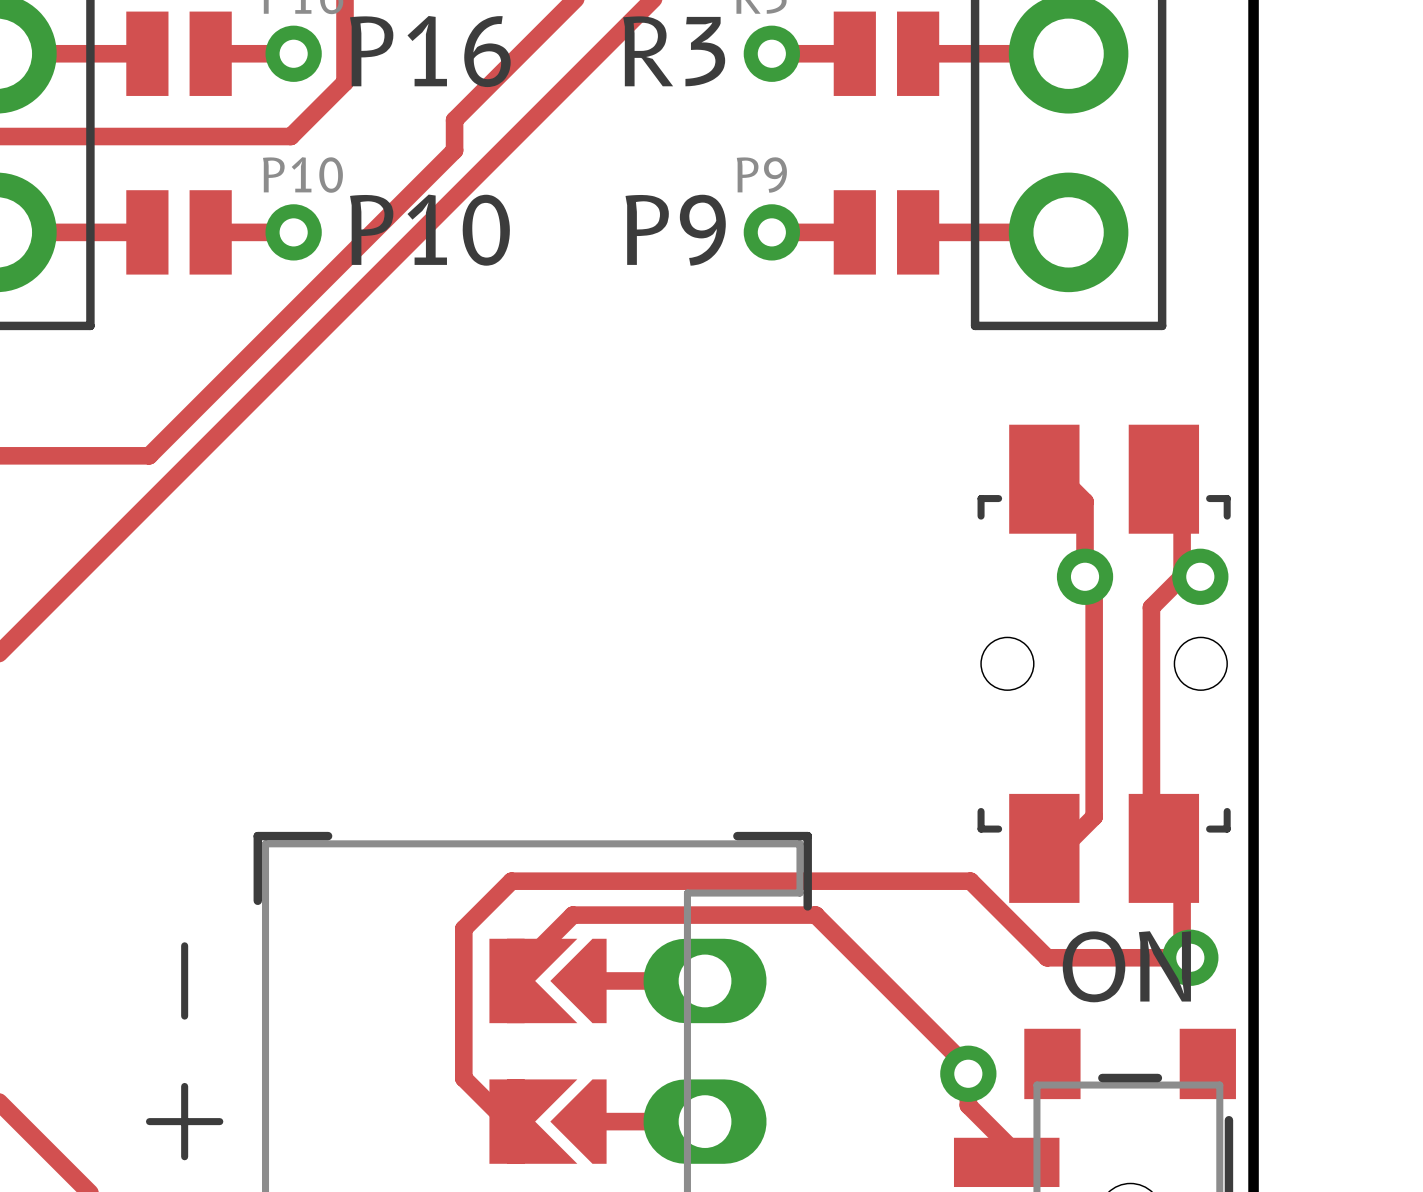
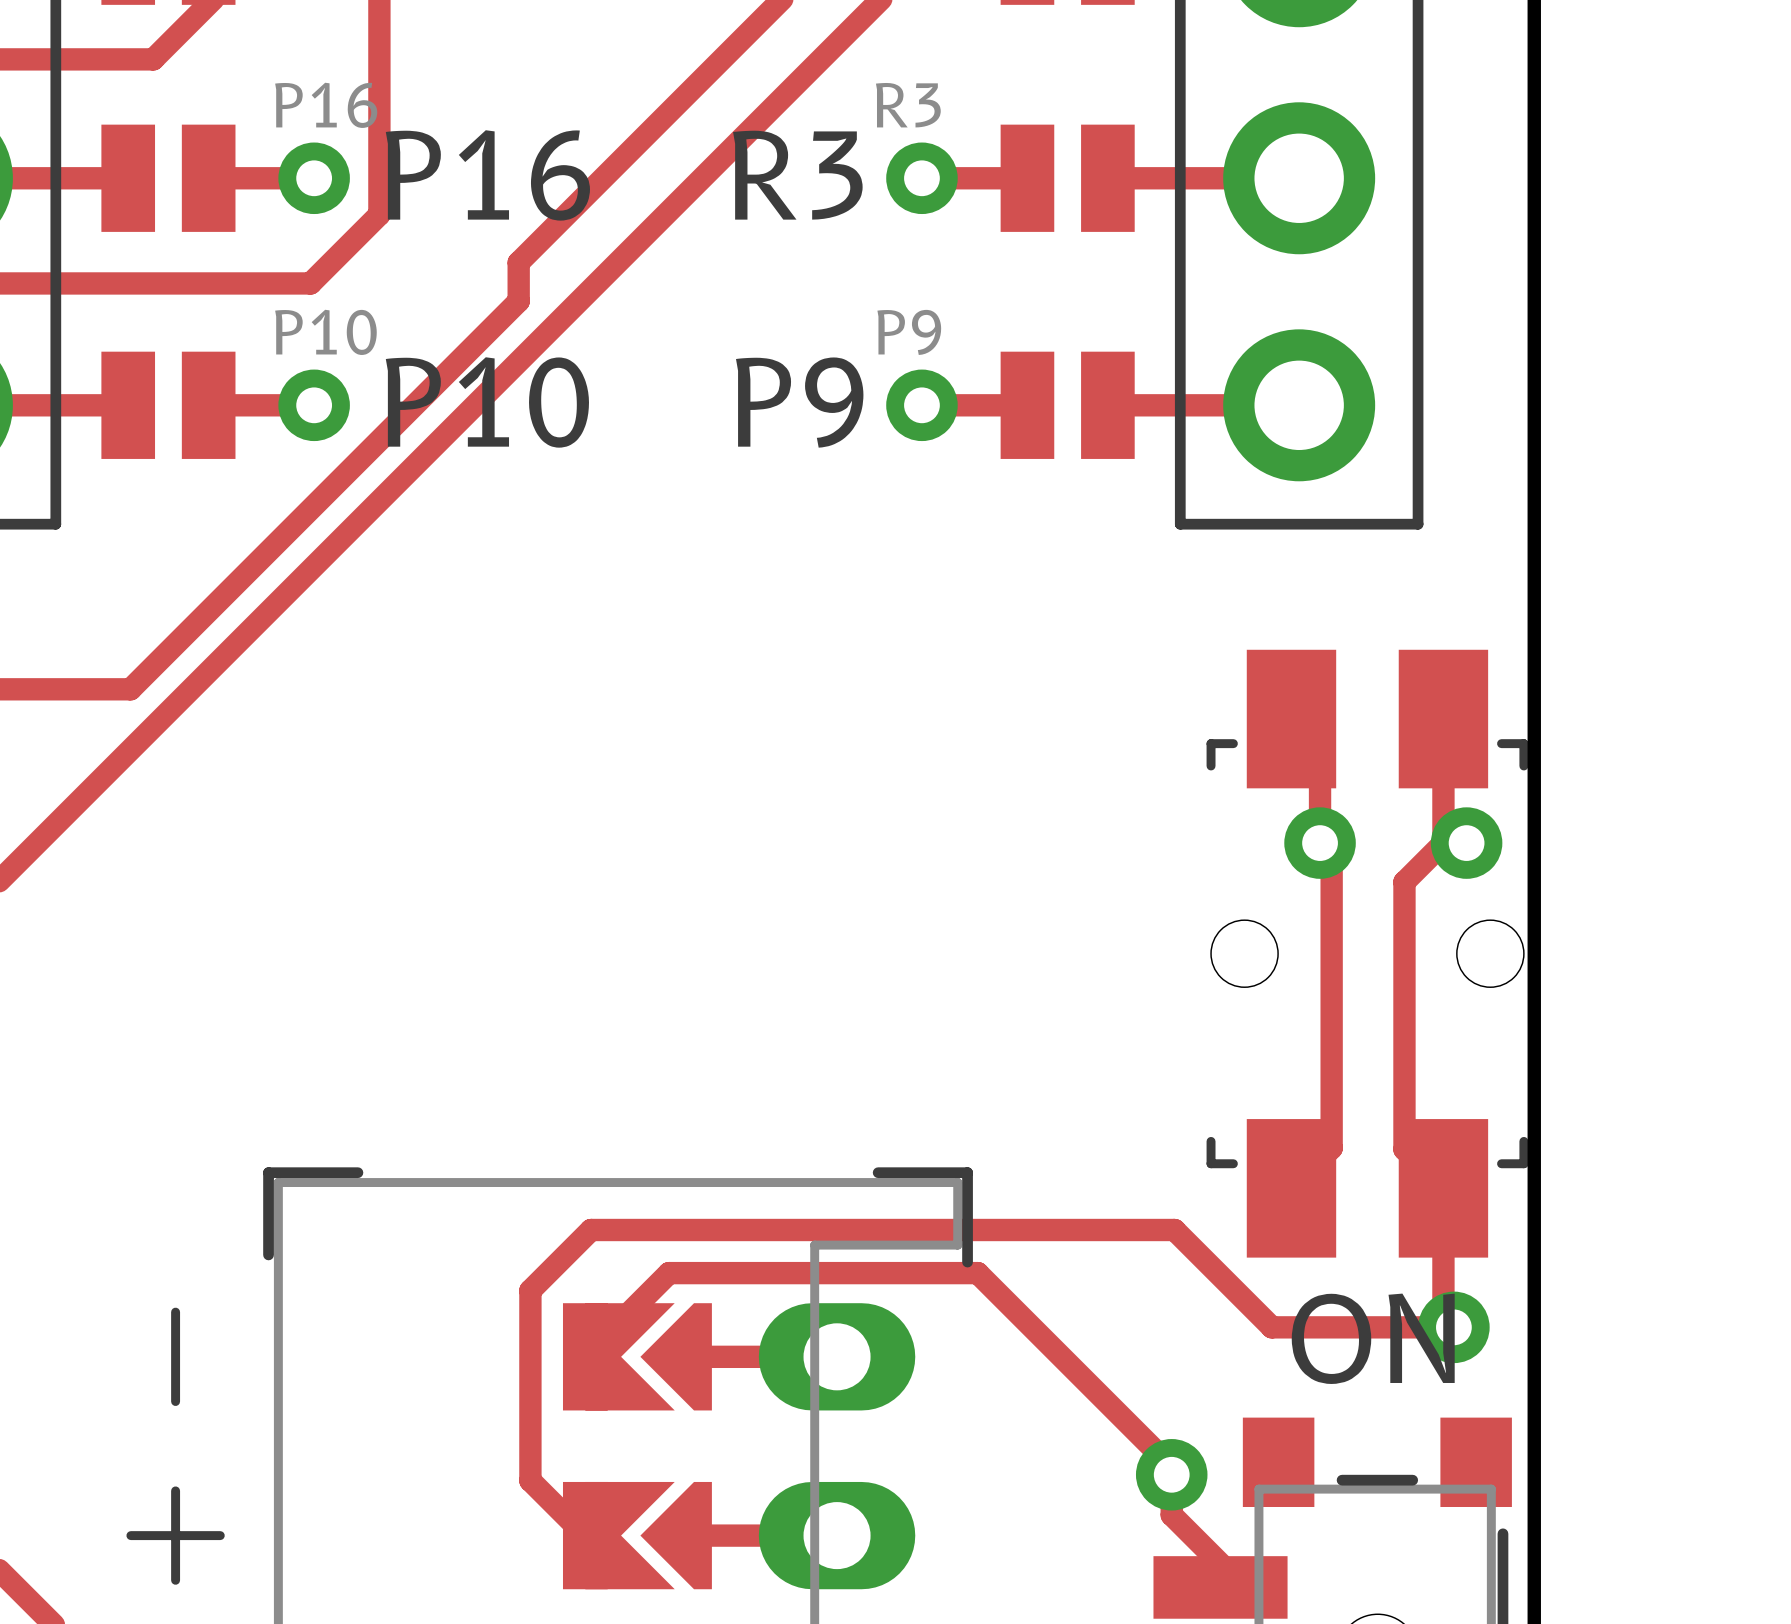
part position: (1104, 663) -> (1367, 953)

